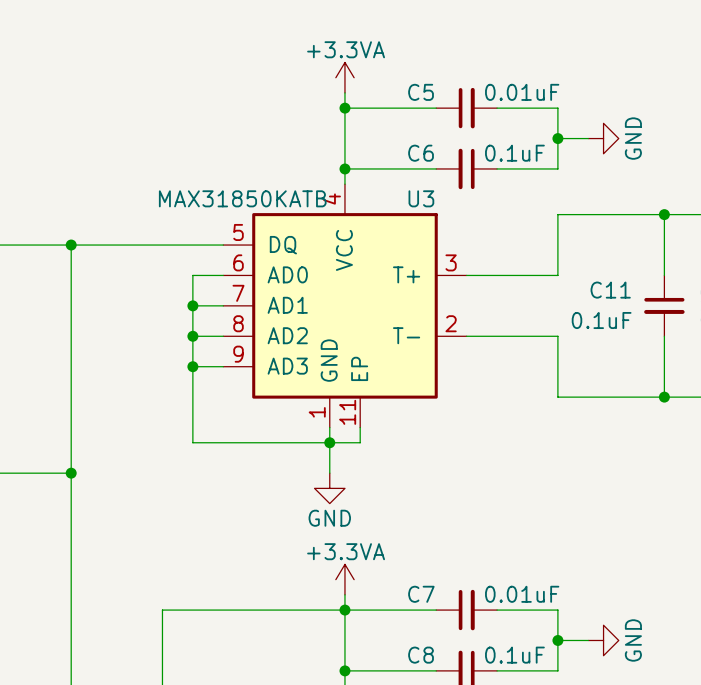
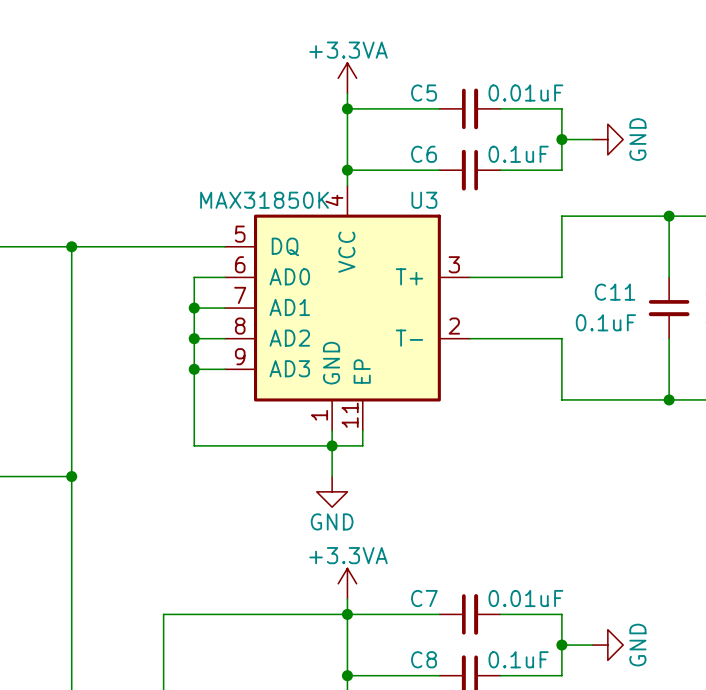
U3 value: MAX31850KATB (242, 198) -> MAX31850K (264, 200)

